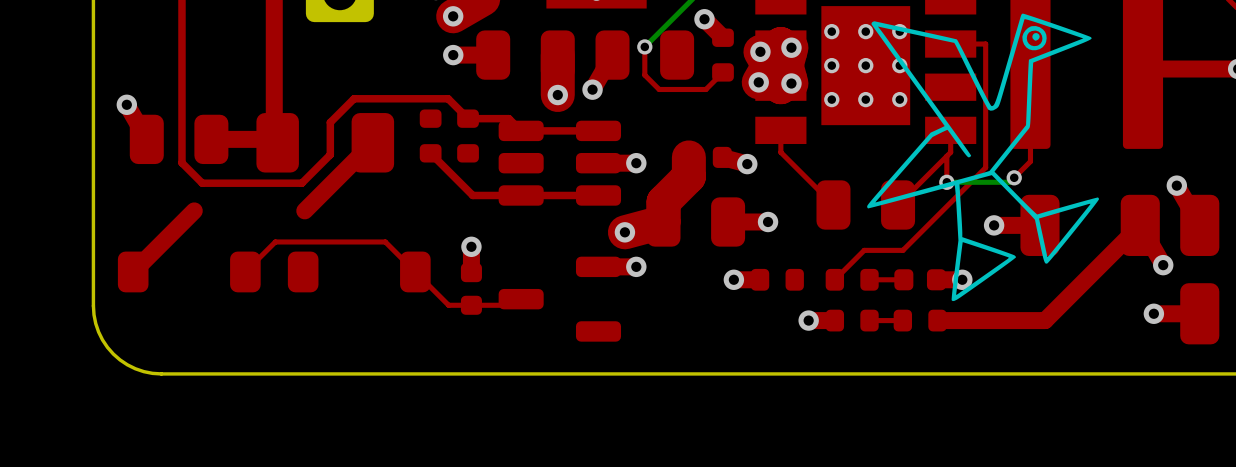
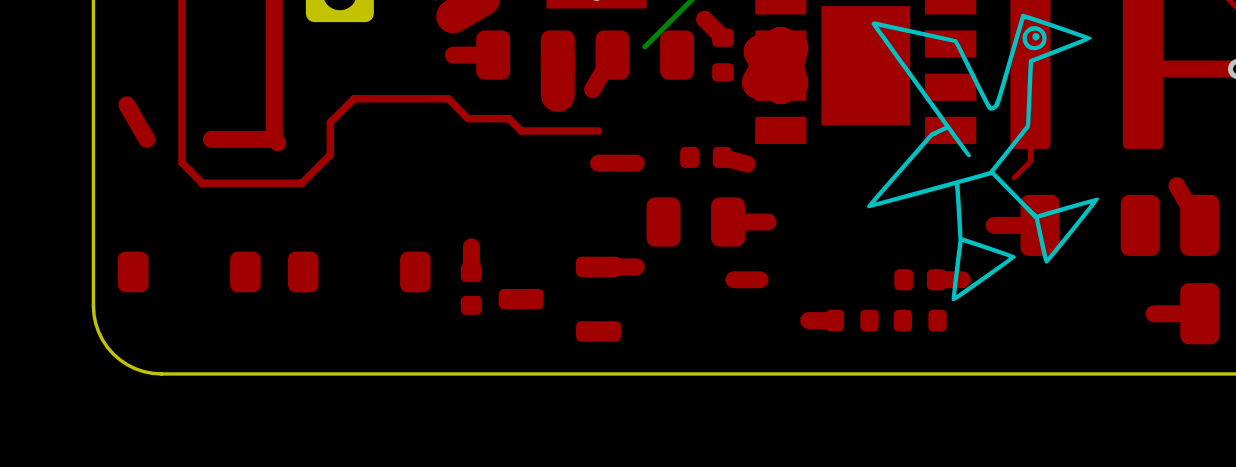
via: (453, 16) -> none
via: (704, 19) -> none
via: (831, 31) -> none
via: (865, 31) -> none
via: (899, 31) -> none
top track: (950, 44) (985, 44) (985, 167) (902, 250) (864, 250) (834, 279) -> none
top track: (644, 46) (644, 75) (659, 89) (705, 89) (723, 72) -> none
via: (644, 46) -> none
via: (791, 47) -> none
via: (760, 51) -> none
via: (453, 55) -> none
via: (831, 65) -> none
via: (865, 65) -> none
via: (899, 65) -> none
via: (758, 82) -> none
via: (791, 83) -> none
via: (592, 89) -> none
via: (557, 95) -> none
via: (831, 99) -> none
via: (865, 99) -> none
via: (899, 99) -> none
via: (126, 104) -> none
top track: (780, 130) (780, 152) (833, 204) -> none
top track: (950, 130) (950, 152) (898, 204) -> none
part: (430, 135) -> none
part: (468, 135) -> none
part: (179, 139) -> none
part: (325, 142) -> none
top track: (372, 142) (304, 210) -> none
top track: (430, 153) (472, 195) (598, 195) -> none
top track: (946, 156) (946, 182) -> none
top track: (688, 157) (688, 176) (663, 201) (663, 221) (624, 232) -> none
part: (559, 163) -> none
via: (636, 163) -> none
via: (747, 164) -> none
bottom track: (1014, 177) (1009, 182) (946, 182) -> none
via: (1014, 177) -> none
via: (946, 182) -> none
via: (1176, 185) -> none
part: (865, 204) -> none
top track: (194, 210) (133, 271) -> none
via: (768, 221) -> none
via: (994, 225) -> none
via: (624, 232) -> none
via: (471, 246) -> none
top track: (1163, 265) (1140, 225) (1045, 320) (937, 320) -> none
via: (1163, 265) -> none
via: (636, 266) -> none
top track: (245, 271) (275, 241) (385, 241) (448, 305) (515, 305) (521, 299) -> none
via: (733, 279) -> none
part: (777, 279) -> none
part: (852, 279) -> none
top track: (903, 279) (869, 279) -> none
via: (962, 279) -> none
via: (1153, 313) -> none
via: (808, 320) -> none
top track: (902, 320) (869, 320) -> none

